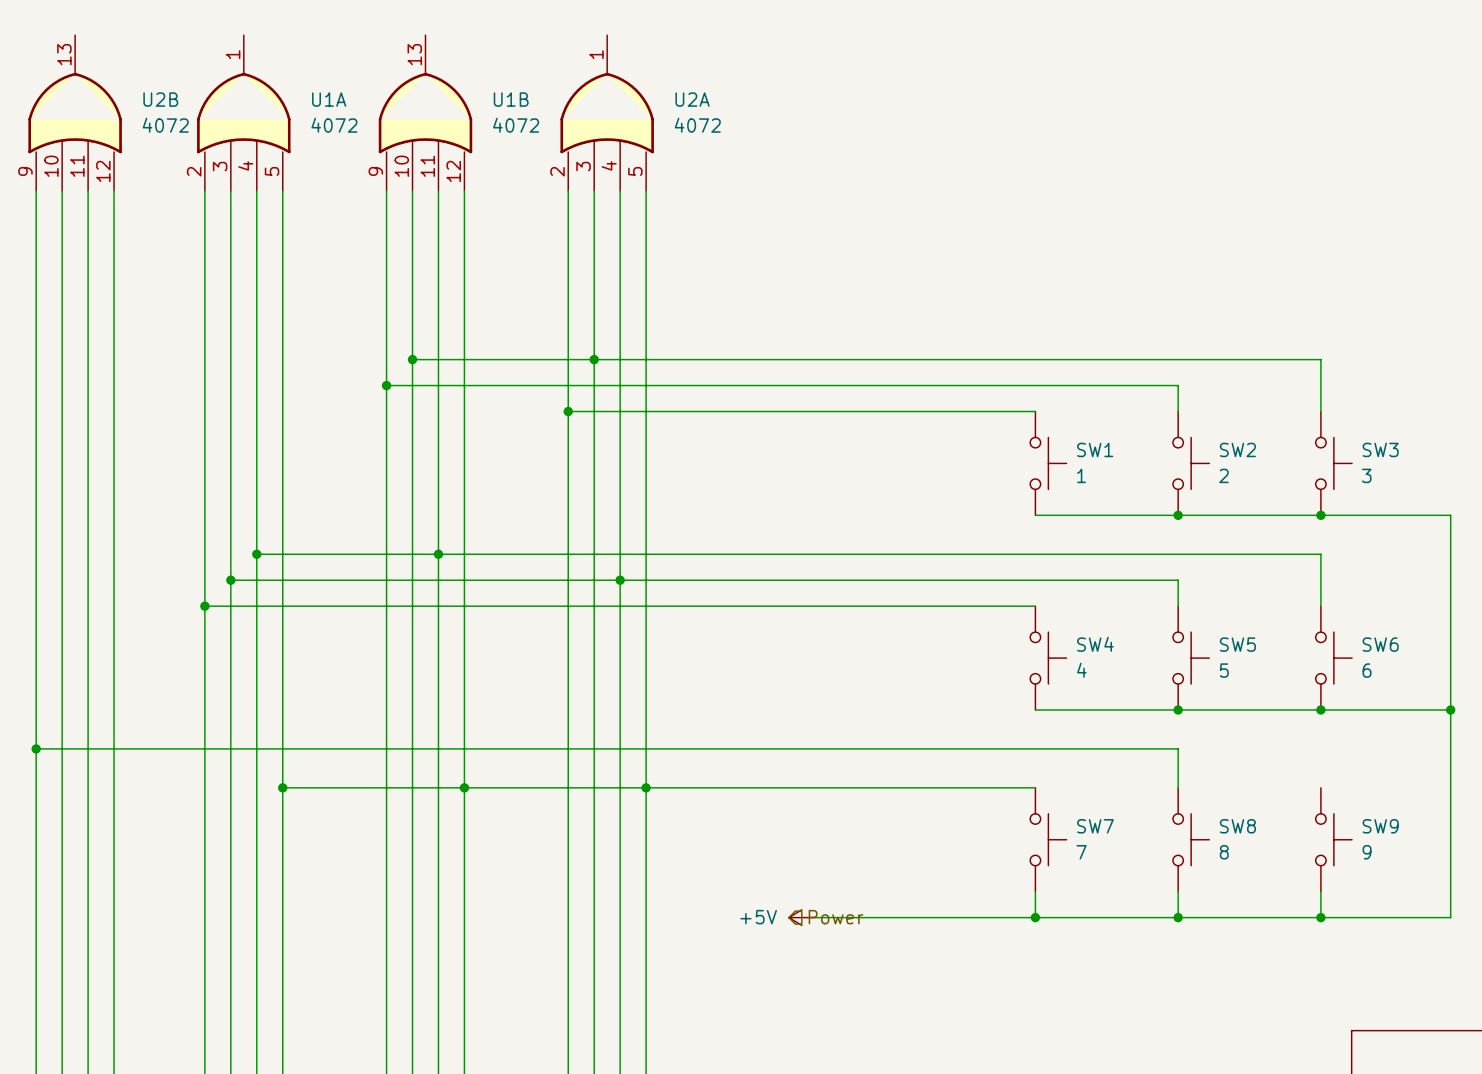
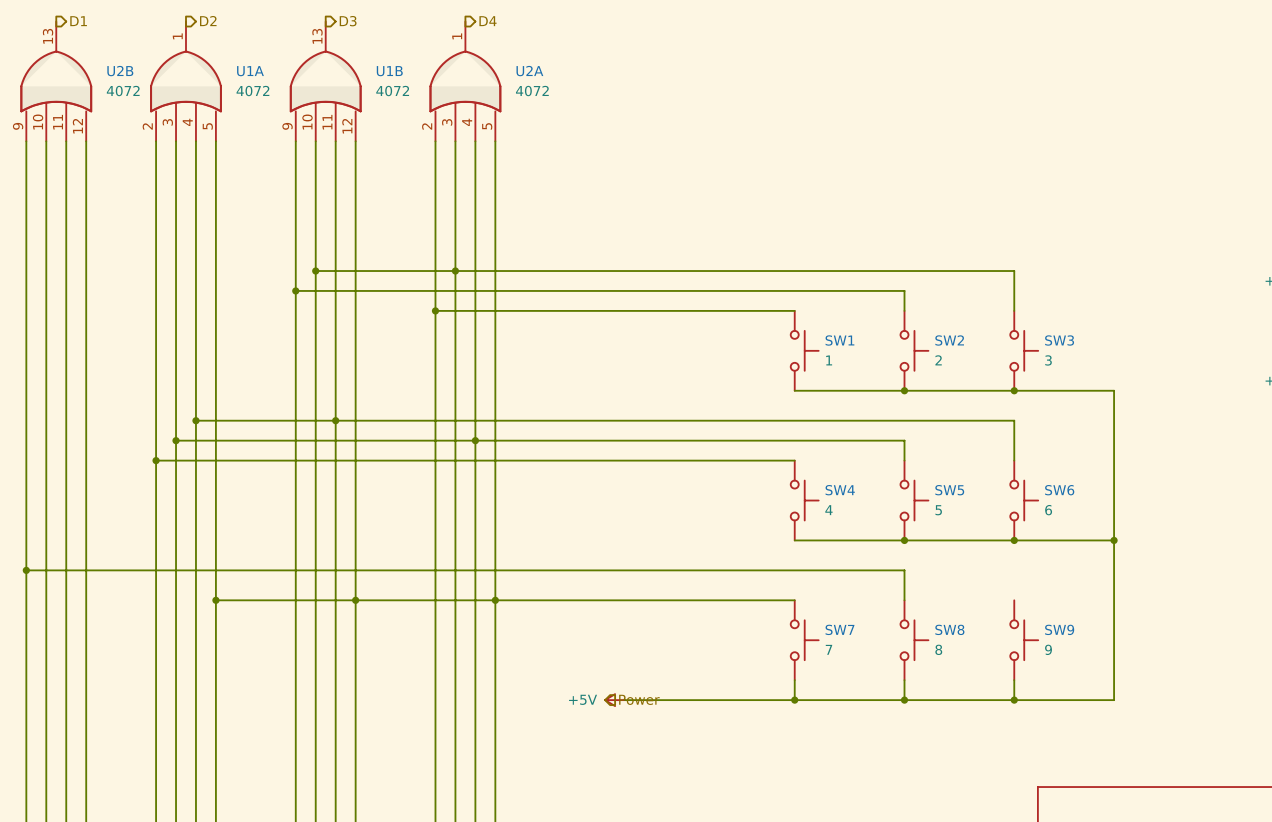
hierarchical label: none -> D1 (78, 21)
hierarchical label: none -> D2 (208, 21)
hierarchical label: none -> D3 (348, 21)
hierarchical label: none -> D4 (488, 21)

